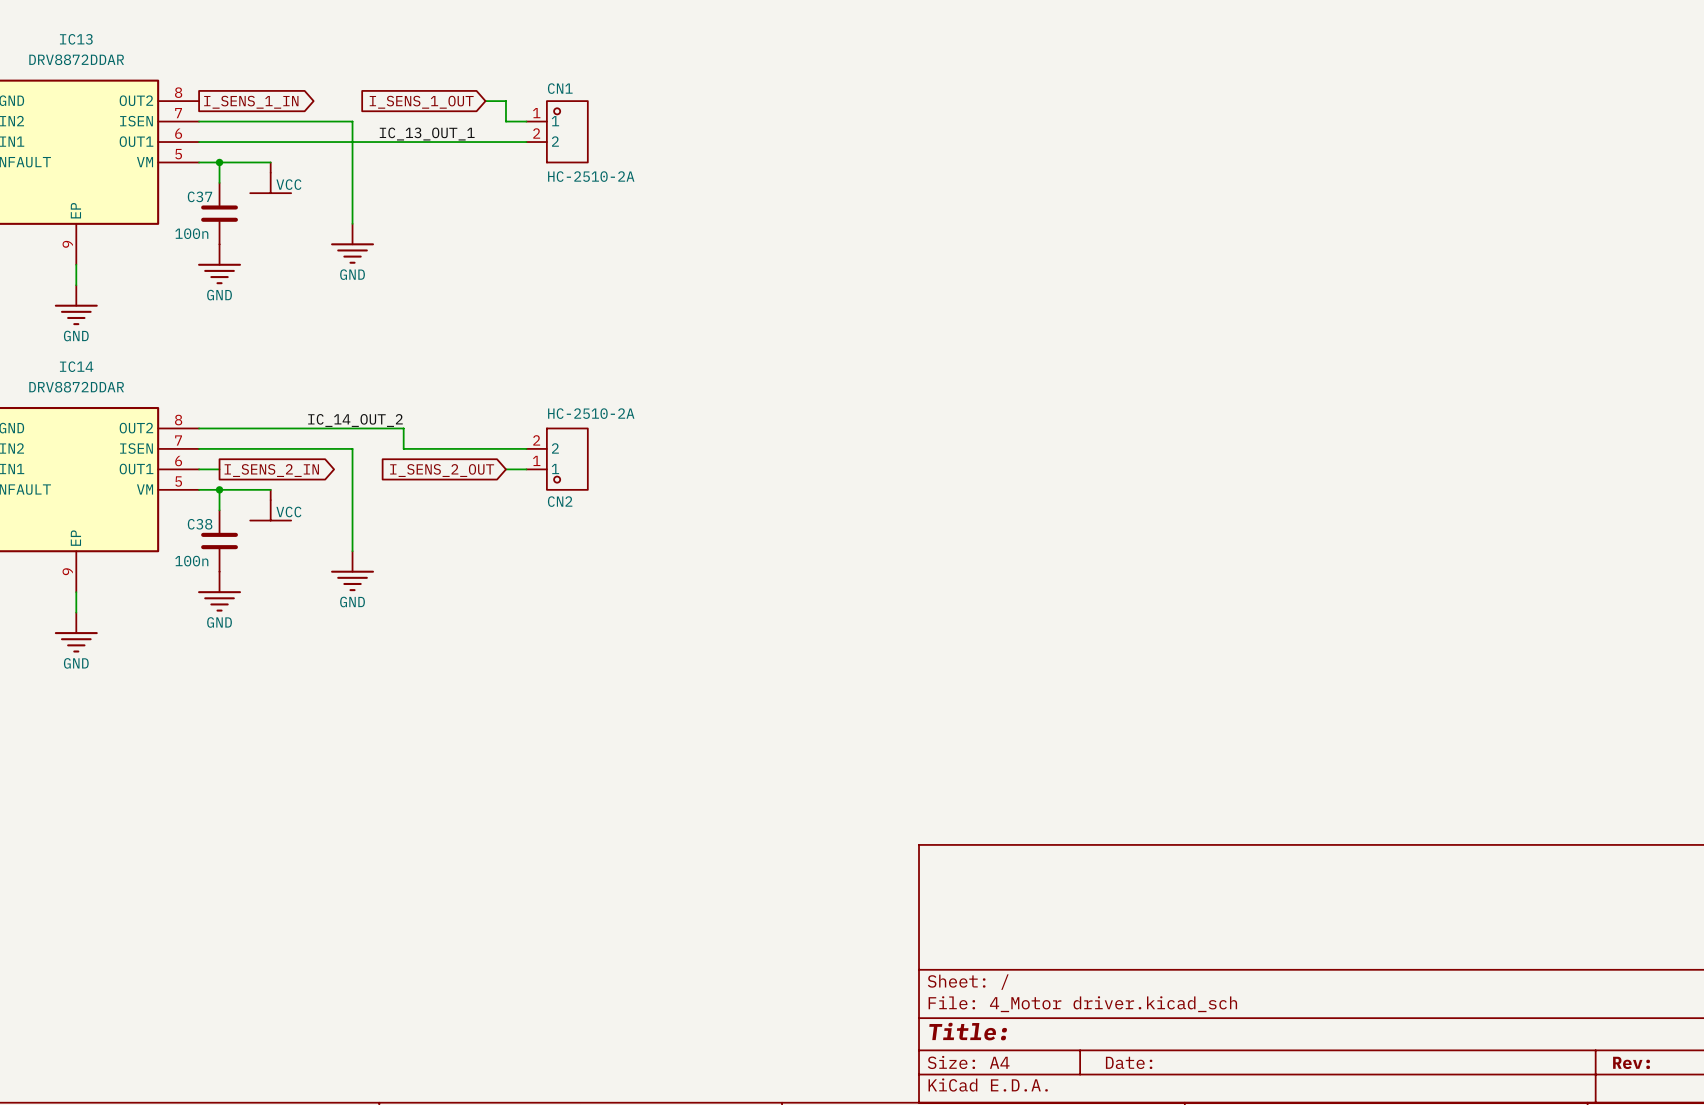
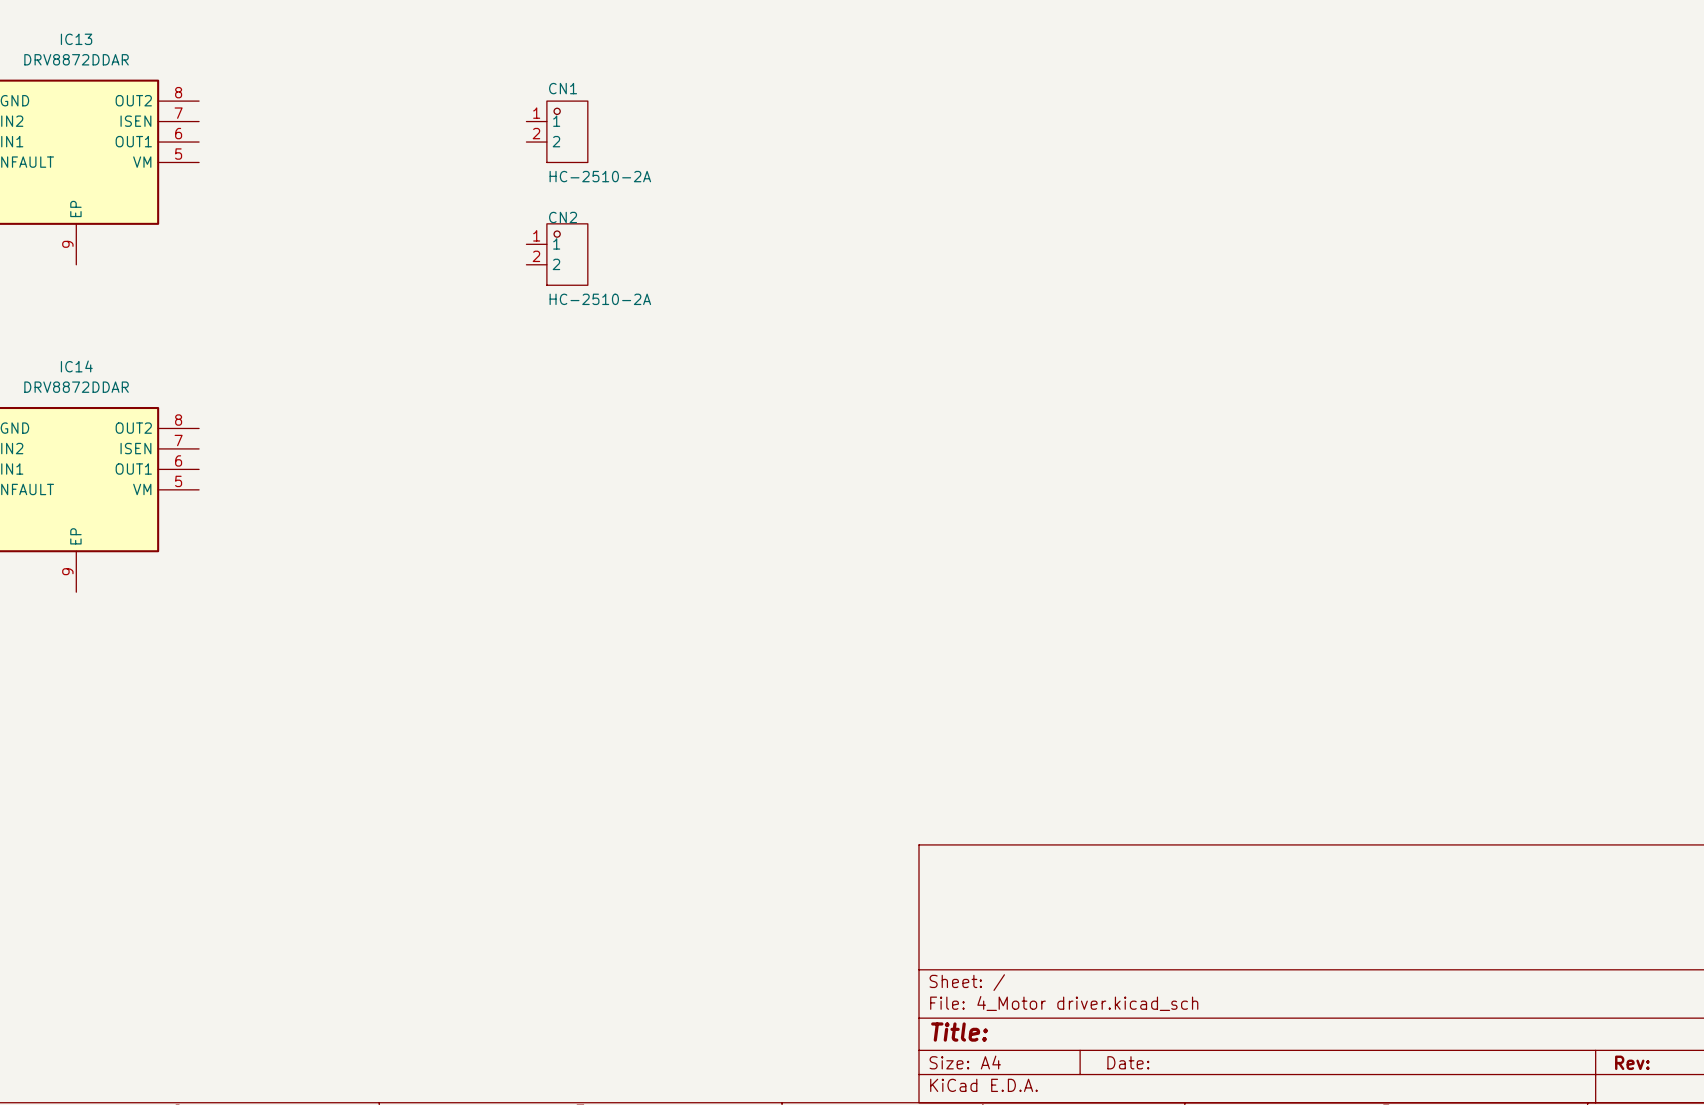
wire: (485, 101) (505, 101) (505, 121) (526, 121) -> none
global label: I_SENS_1_IN (251, 102) -> none
global label: I_SENS_1_OUT (421, 102) -> none
wire: (199, 121) (352, 121) (352, 223) -> none
label: IC_13_OUT_1 (427, 134) -> none
wire: (199, 142) (526, 142) -> none
wire: (199, 162) (270, 162) -> none
wire: (219, 162) (219, 182) -> none
junction: (219, 162) -> none
power symbol: VCC (270, 177) -> none
C37: 100n (219, 213) -> none
power symbol: GND (352, 243) -> none
wire: (76, 264) (76, 285) -> none
power symbol: GND (219, 264) -> none
power symbol: GND (76, 305) -> none
label: IC_14_OUT_2 (355, 420) -> none
wire: (199, 428) (403, 428) (403, 448) (526, 448) -> none
wire: (199, 448) (352, 448) (352, 551) -> none
CN2 position: (557, 459) -> (557, 254)
CN2 flip: as is (567, 459) -> up-down (567, 254)
wire: (199, 469) (219, 469) -> none
wire: (505, 469) (526, 469) -> none
global label: I_SENS_2_IN (271, 470) -> none
global label: I_SENS_2_OUT (442, 470) -> none
wire: (199, 489) (270, 489) -> none
wire: (219, 489) (219, 510) -> none
junction: (219, 489) -> none
power symbol: VCC (270, 505) -> none
C38: 100n (219, 541) -> none
power symbol: GND (352, 571) -> none
power symbol: GND (219, 591) -> none
wire: (76, 592) (76, 612) -> none
power symbol: GND (76, 632) -> none

